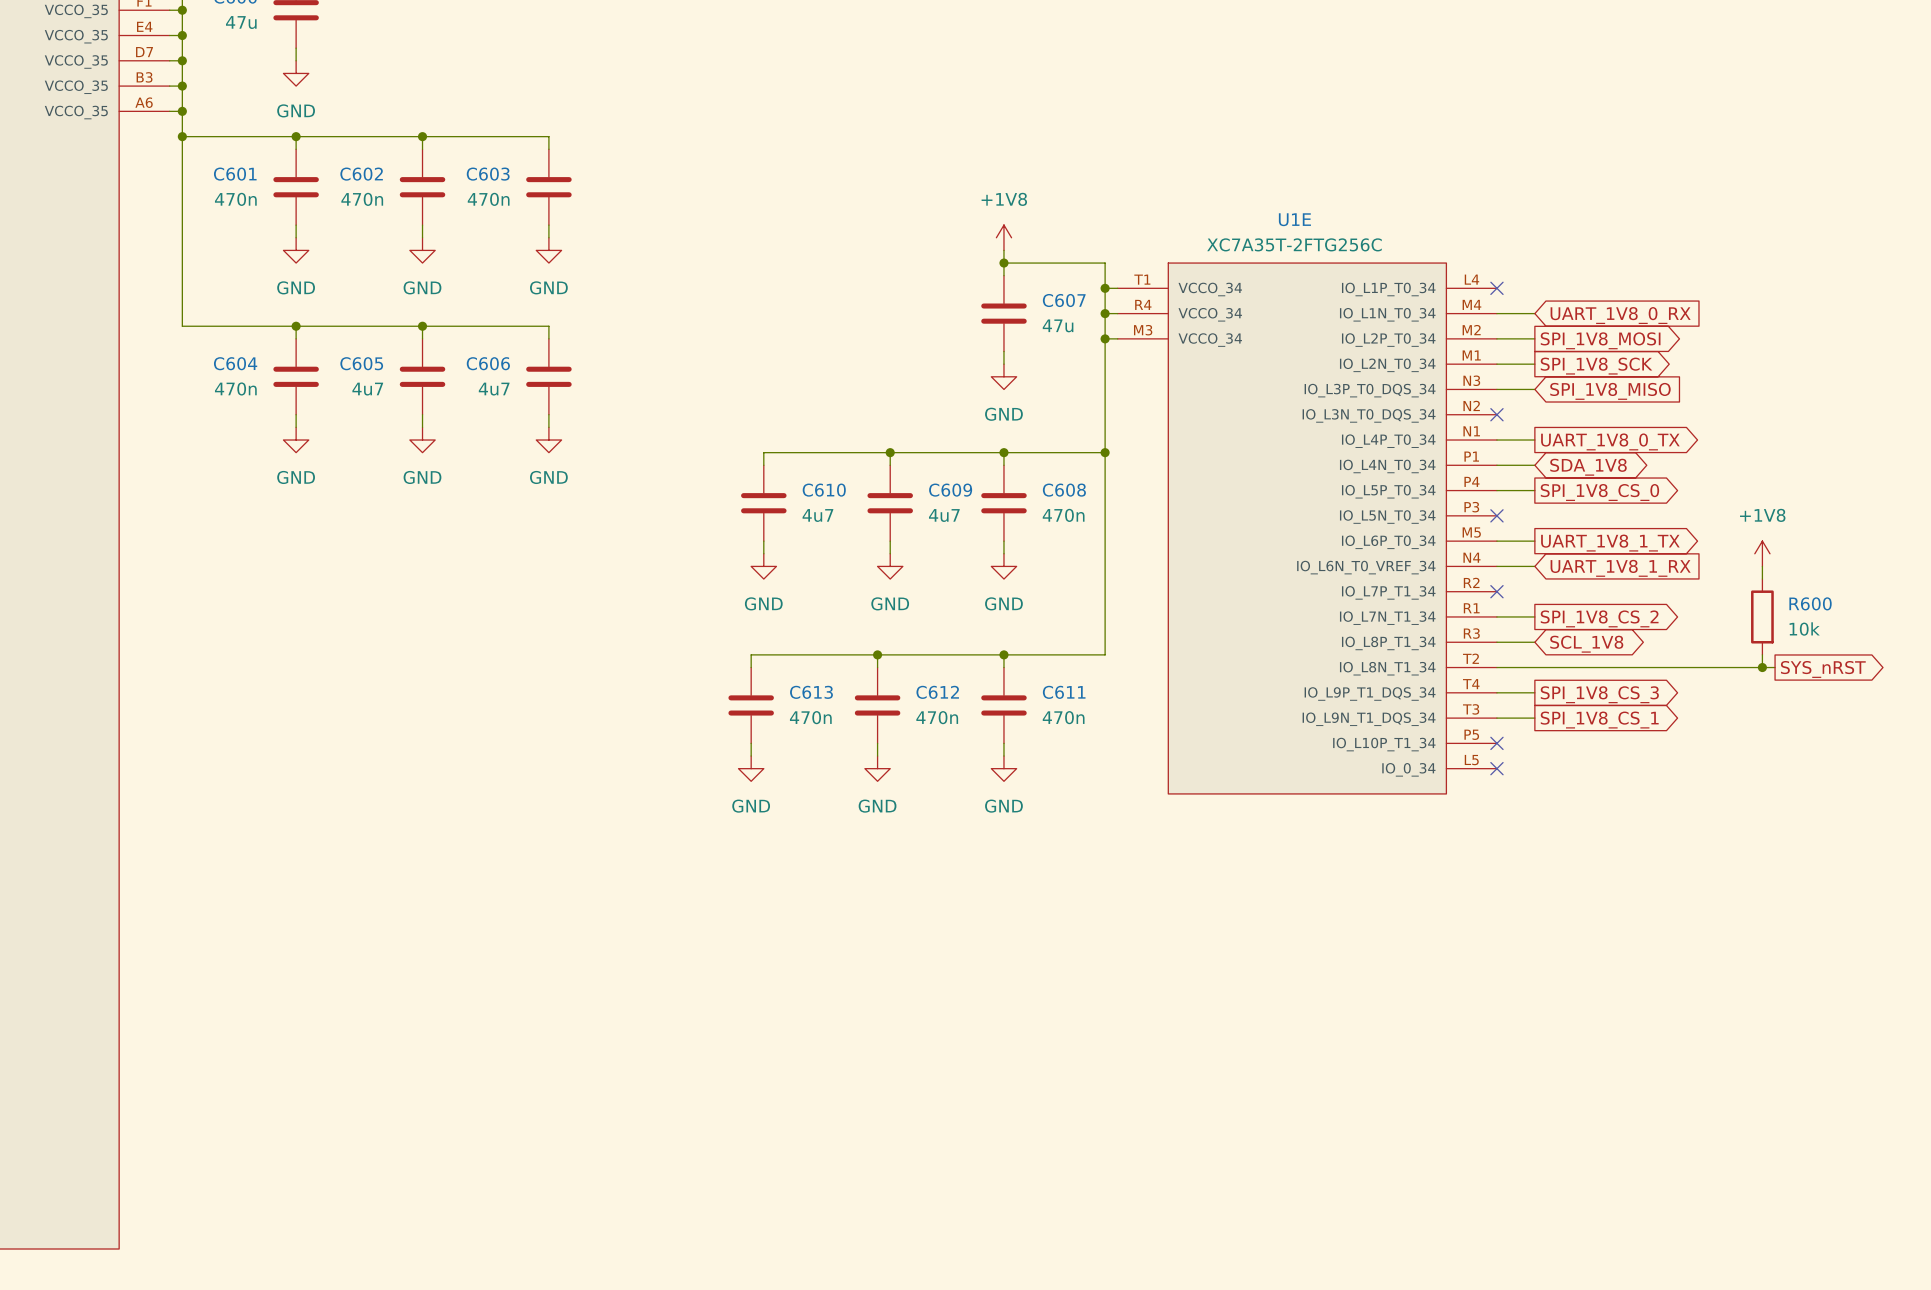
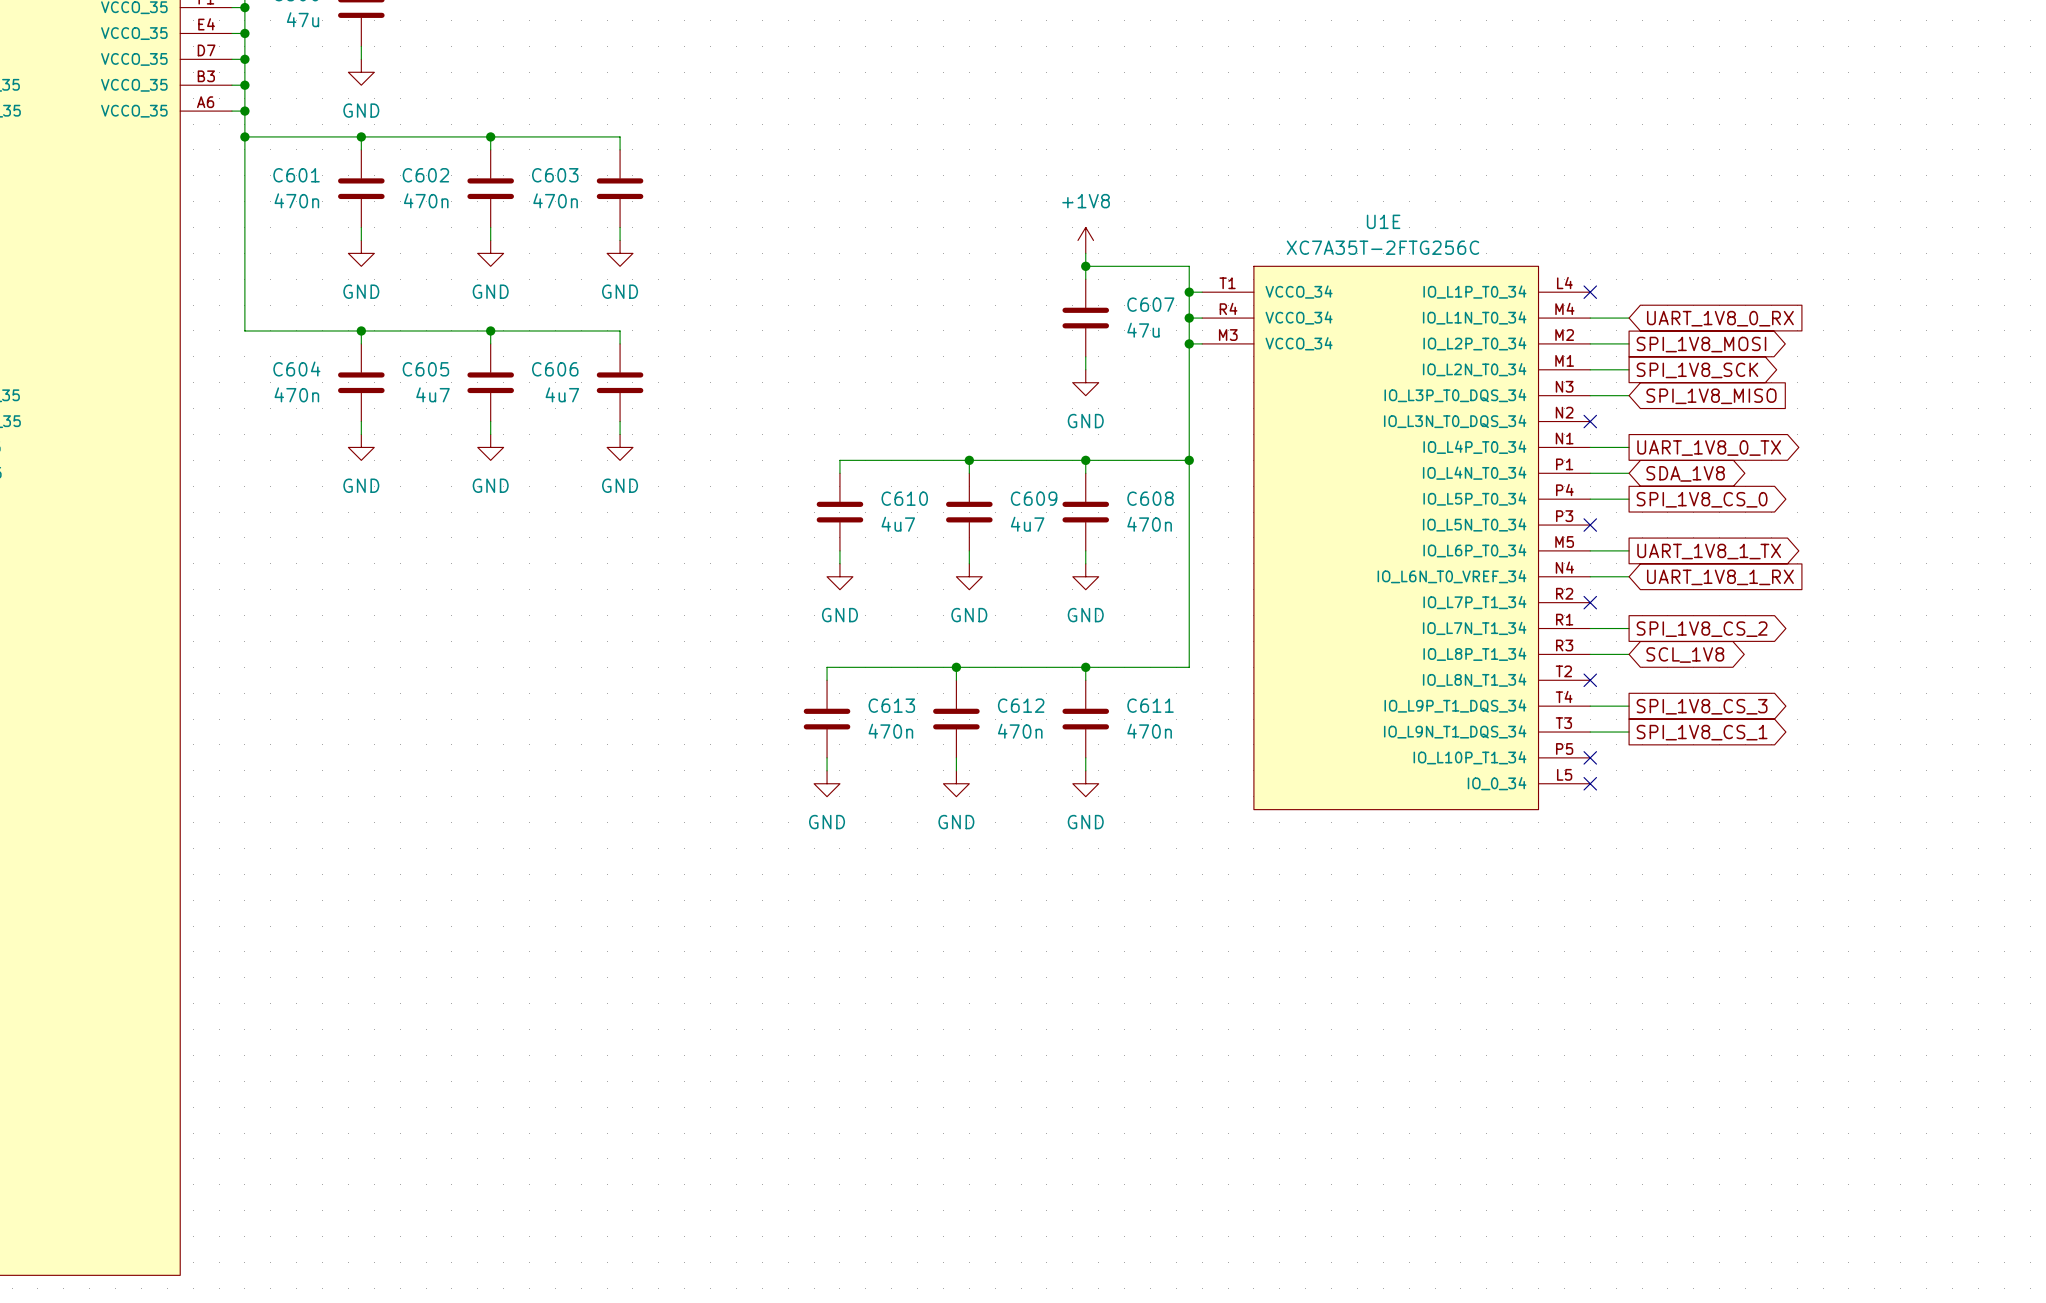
power symbol: +1V8 (1762, 553) -> none
wire: (1762, 566) (1762, 579) -> none
R600: 10k (1762, 616) -> none
wire: (1762, 654) (1762, 667) -> none
wire: (1496, 667) (1775, 667) -> none
no-connect mark: none -> (1590, 680)
junction: (1762, 667) -> none
global label: SYS_nRST (1823, 669) -> none

